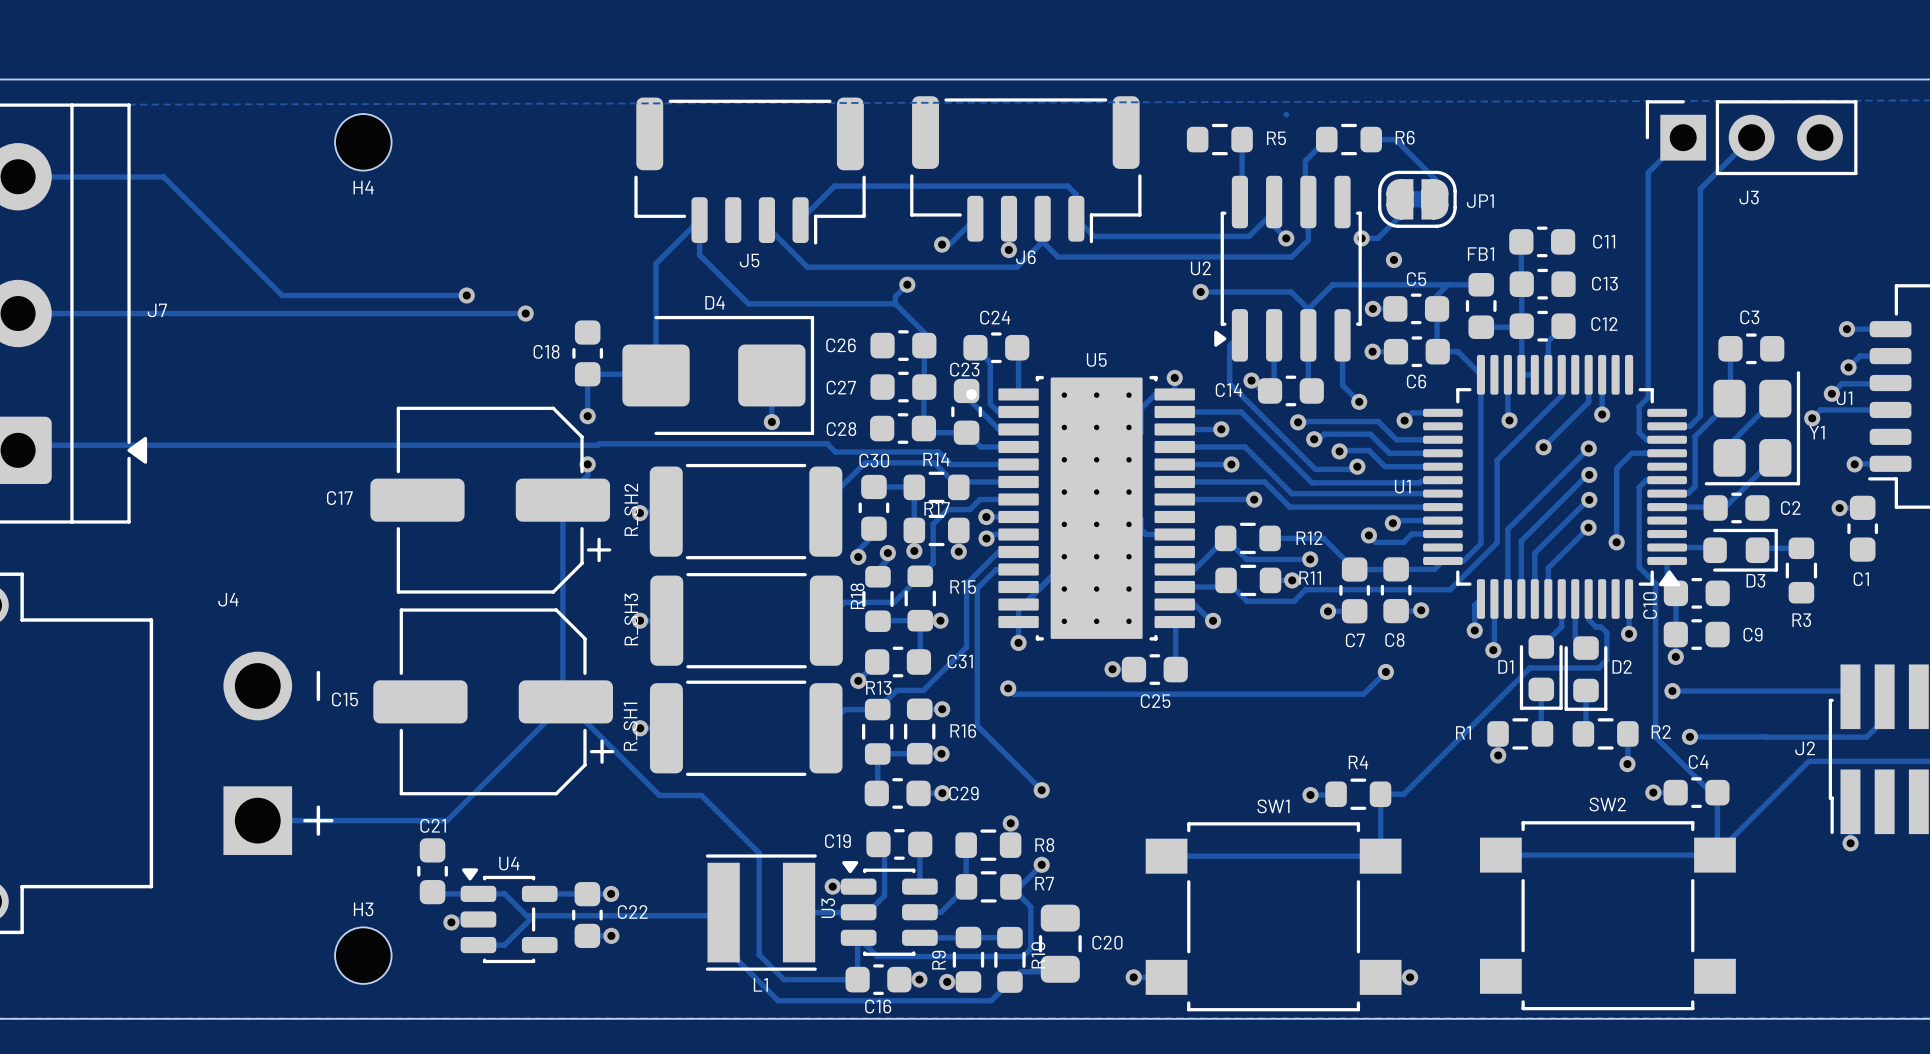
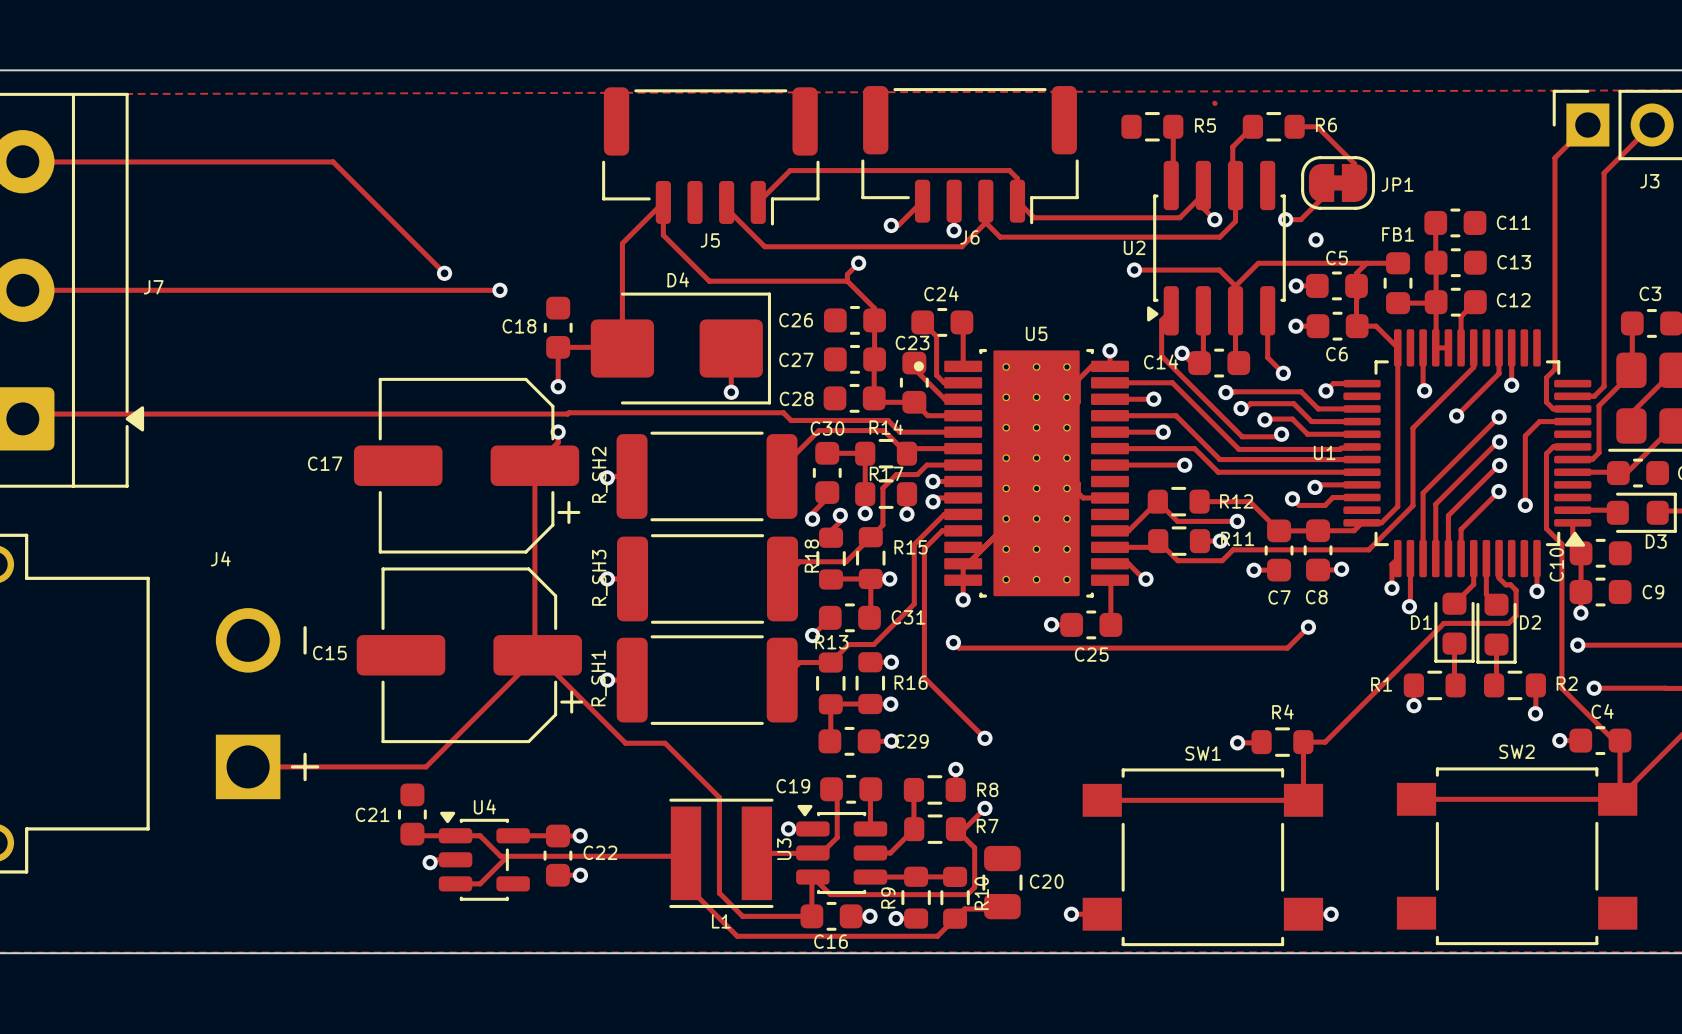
H4: (363, 142) -> none
track: (163, 177) (282, 295) (466, 295) -> (159, 161) (333, 161) (444, 273)
C21 name position: C21 (433, 825) -> C21 (372, 814)
H3: (363, 955) -> none

